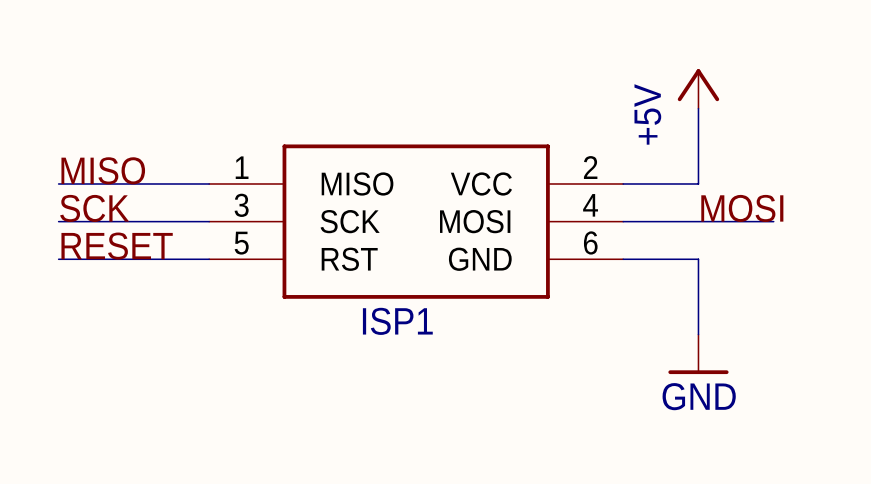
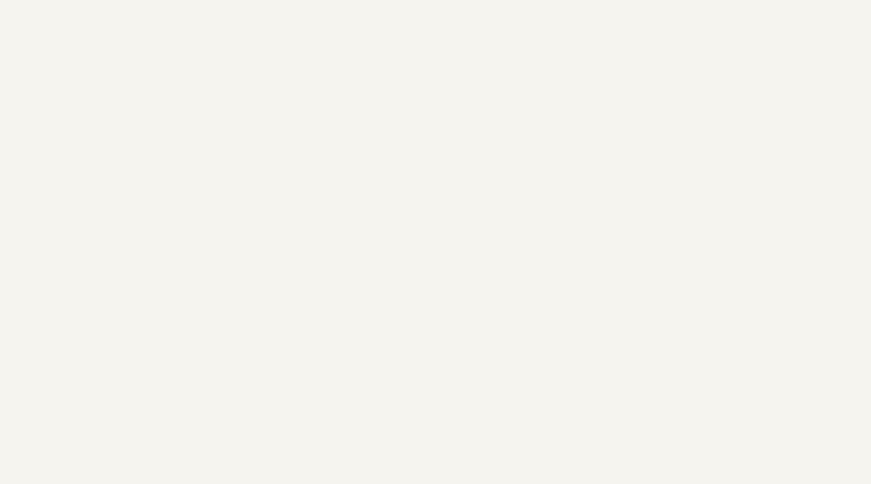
power symbol: +5V (698, 88) -> none
wire: (698, 108) (698, 183) (623, 183) -> none
label: MISO (103, 170) -> none
wire: (58, 183) (209, 183) -> none
label: SCK (94, 208) -> none
label: MOSI (742, 208) -> none
wire: (58, 221) (209, 221) -> none
ISP1: (416, 221) -> none
wire: (623, 221) (773, 221) -> none
label: RESET (117, 246) -> none
wire: (58, 259) (209, 259) -> none
wire: (623, 259) (698, 259) (698, 334) -> none
power symbol: GND (698, 354) -> none

